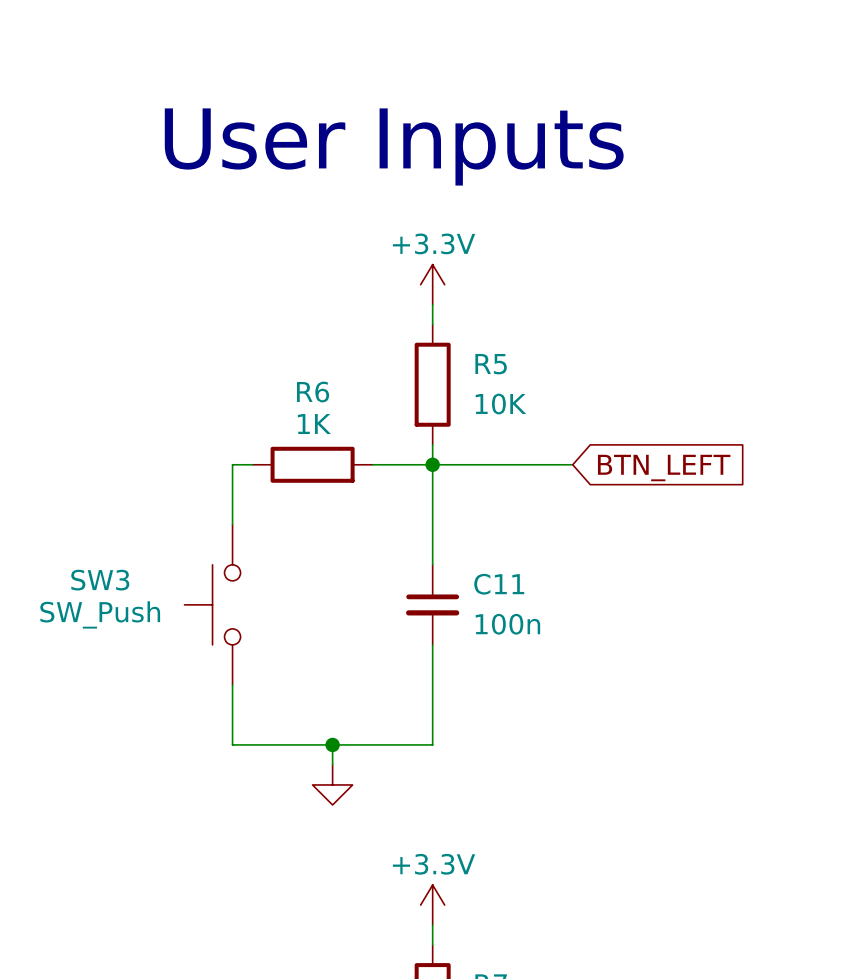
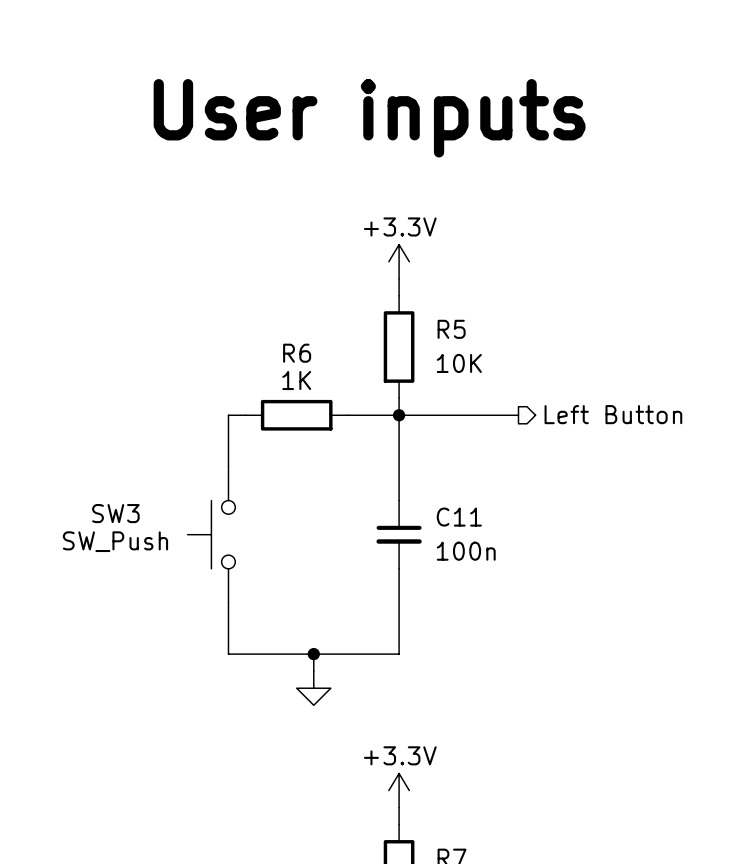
text: User Inputs (394, 146) -> User inputs (369, 118)
hierarchical label: none -> Left Button (613, 414)
global label: BTN_LEFT (664, 468) -> none

